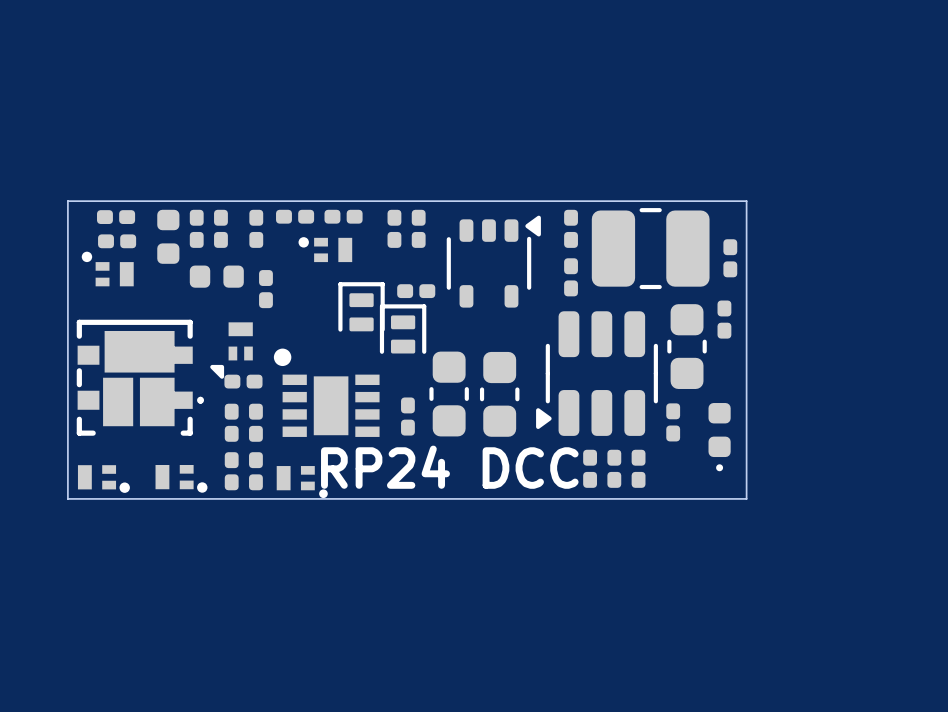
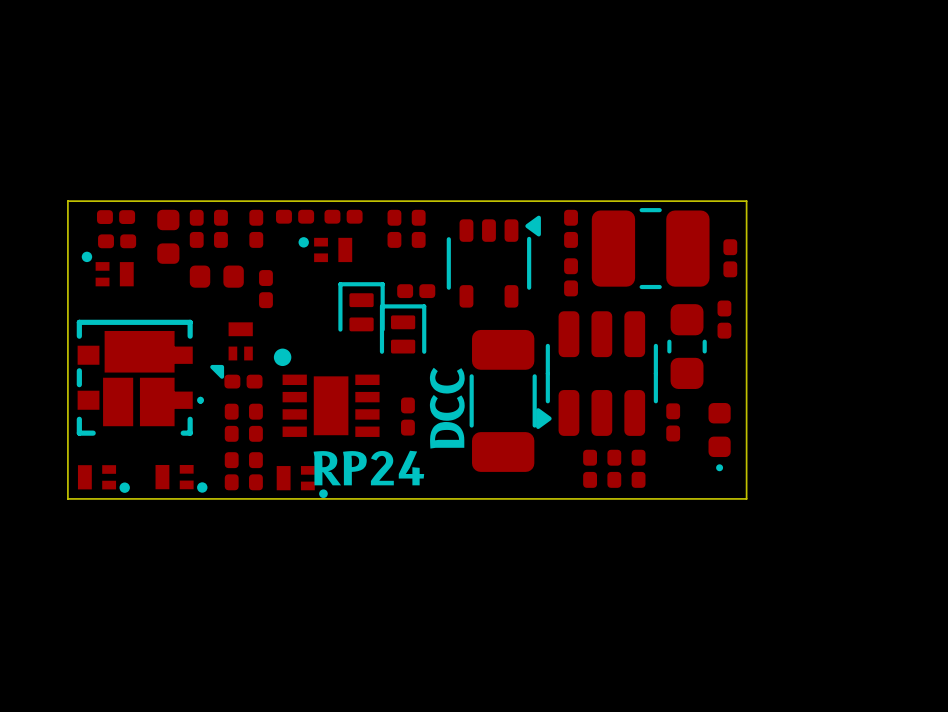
part footprint: [479, 351, 520, 437] -> [469, 329, 537, 472]
text: none -> DCC (447, 408)
part: (449, 394) -> none
text: RP24 DCC (449, 467) -> RP24 (368, 468)

